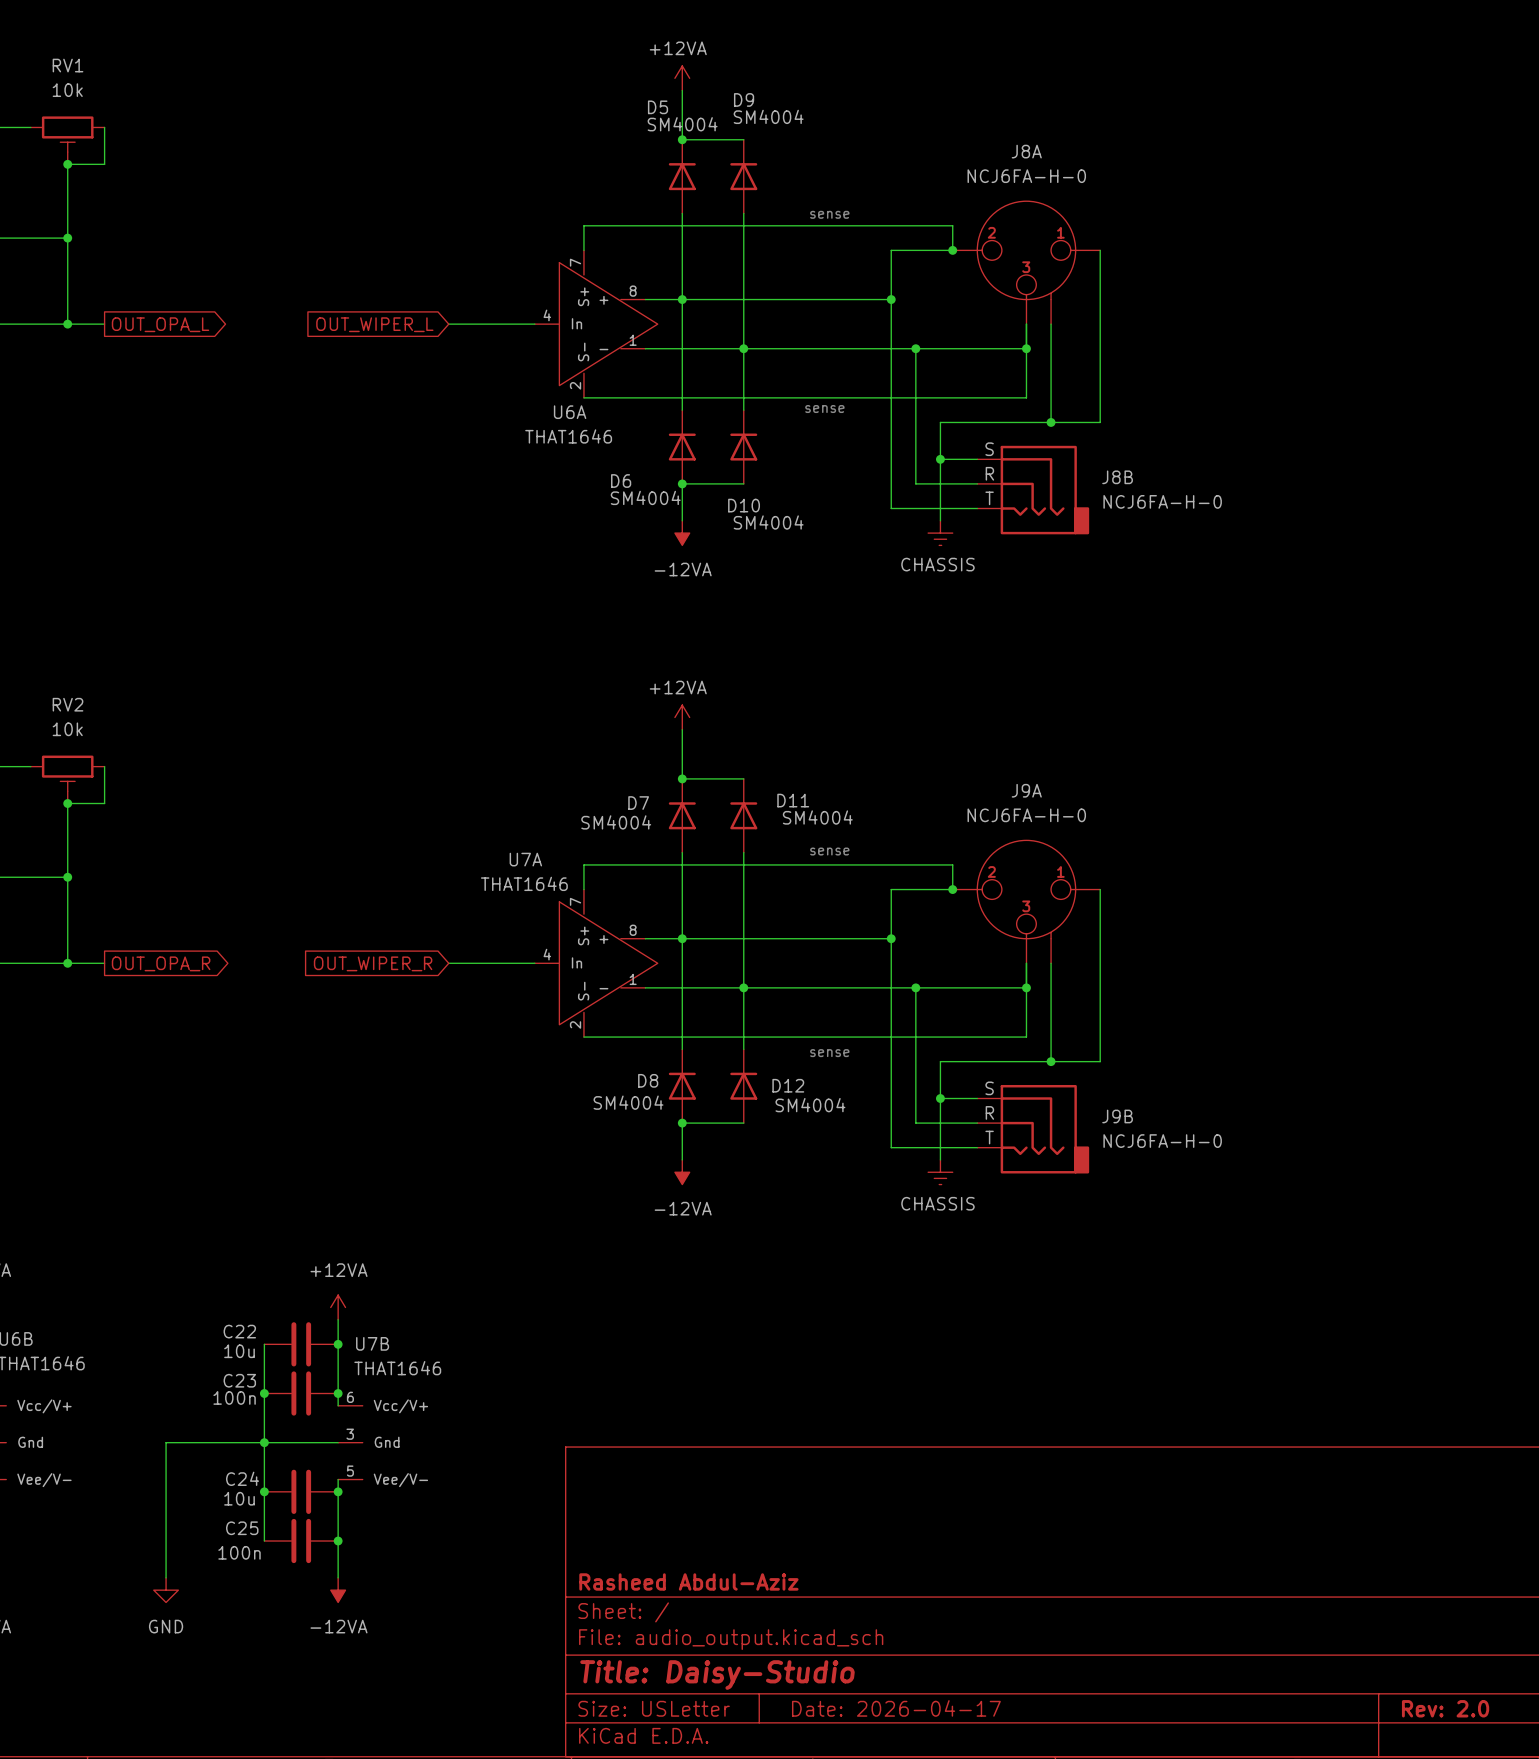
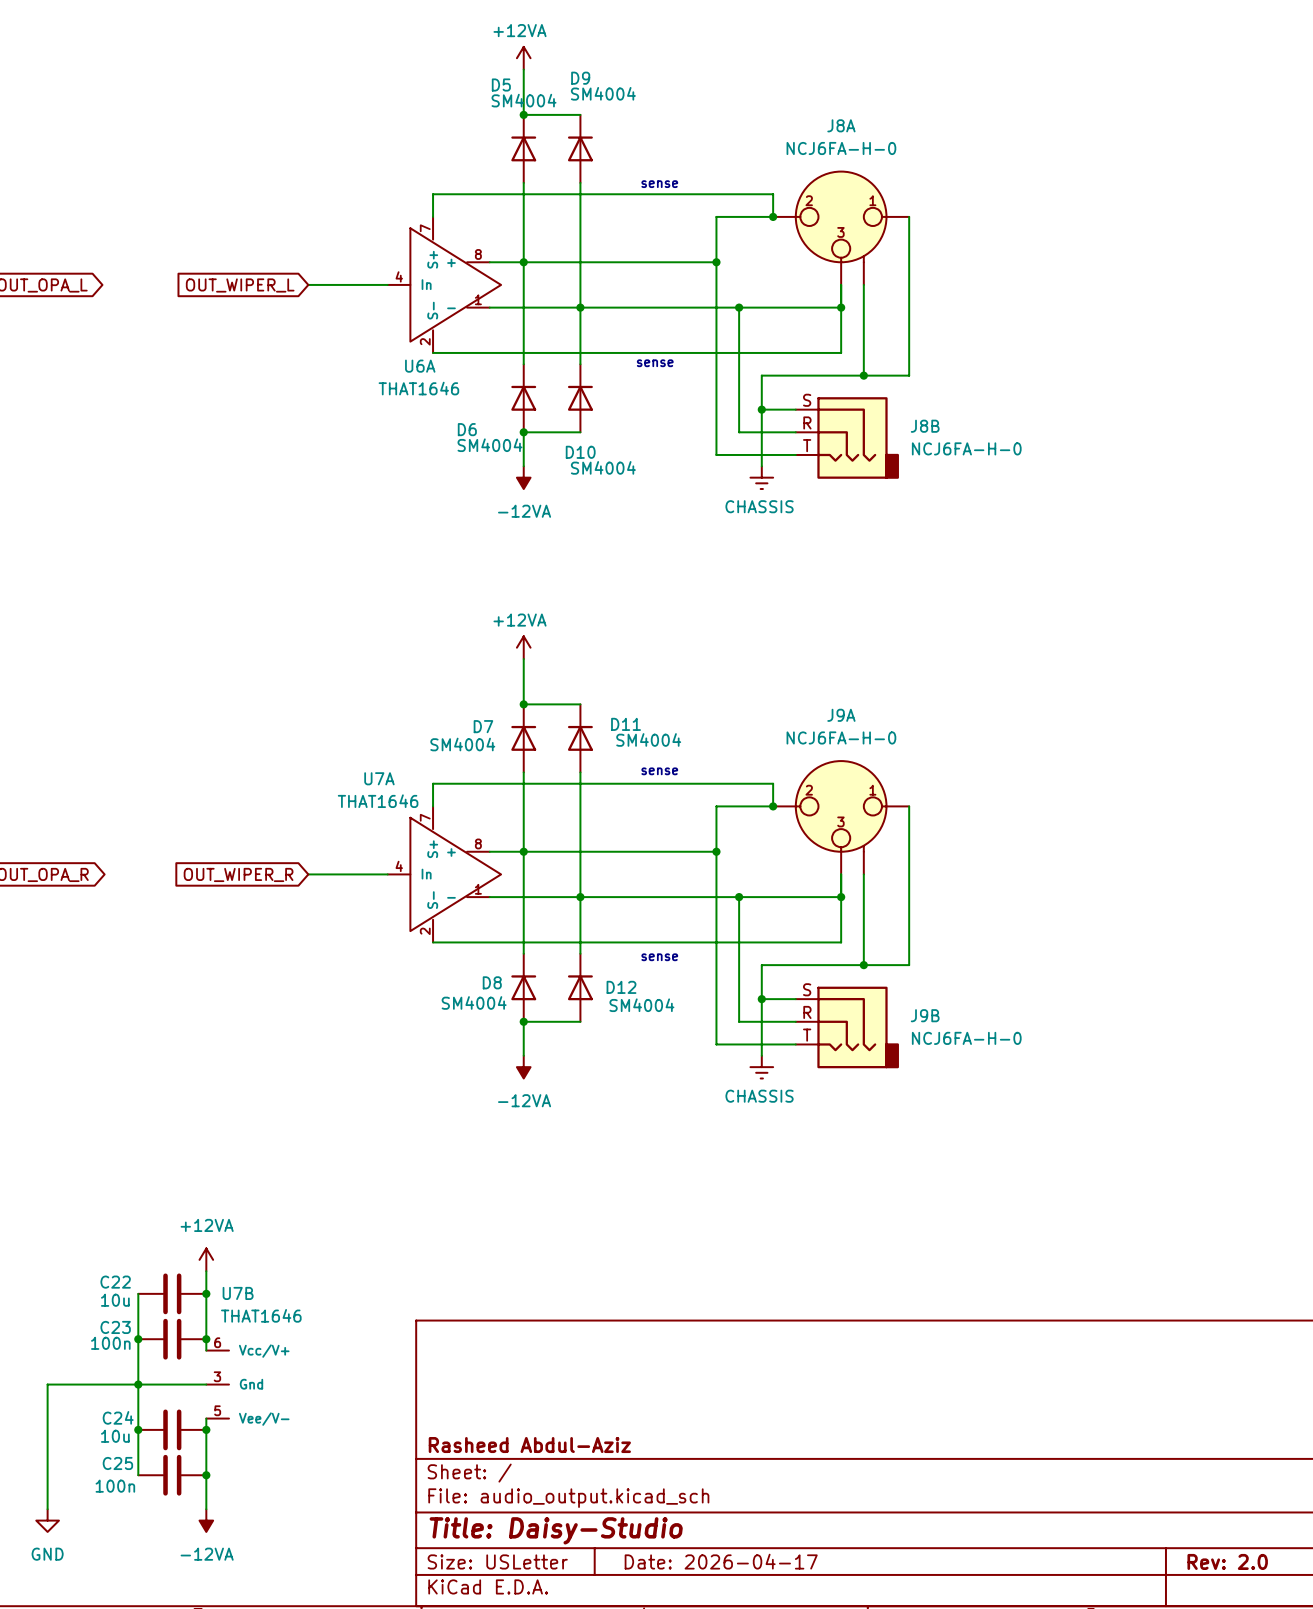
power symbol position: +12VA (338, 1307) -> +12VA (206, 1259)
wire: (338, 1319) (338, 1393) -> none
wire: (264, 1344) (264, 1418) -> (138, 1407) (138, 1475)
C22 position: (301, 1344) -> (172, 1293)
junction: (338, 1344) -> none
junction: (264, 1393) -> none
C23 position: (301, 1393) -> (172, 1339)
junction position: (338, 1393) -> (206, 1293)
junction: (264, 1442) -> none
wire: (338, 1442) (166, 1442) (166, 1516) -> (206, 1384) (47, 1384)
U7B position: (350, 1442) -> (217, 1384)
junction: none -> (138, 1339)
wire: (338, 1479) (338, 1553) -> (206, 1350) (206, 1282)
junction: (264, 1491) -> none
C24 position: (301, 1491) -> (172, 1429)
junction position: (338, 1491) -> (206, 1339)
junction: none -> (138, 1384)
C25 position: (301, 1541) -> (172, 1475)
junction position: (338, 1541) -> (206, 1429)
junction: none -> (138, 1429)
wire: none -> (47, 1441) (47, 1509)
wire: none -> (206, 1441) (206, 1509)
power symbol position: GND (166, 1590) -> GND (47, 1520)
power symbol position: -12VA (338, 1590) -> -12VA (206, 1520)
junction: none -> (206, 1475)

